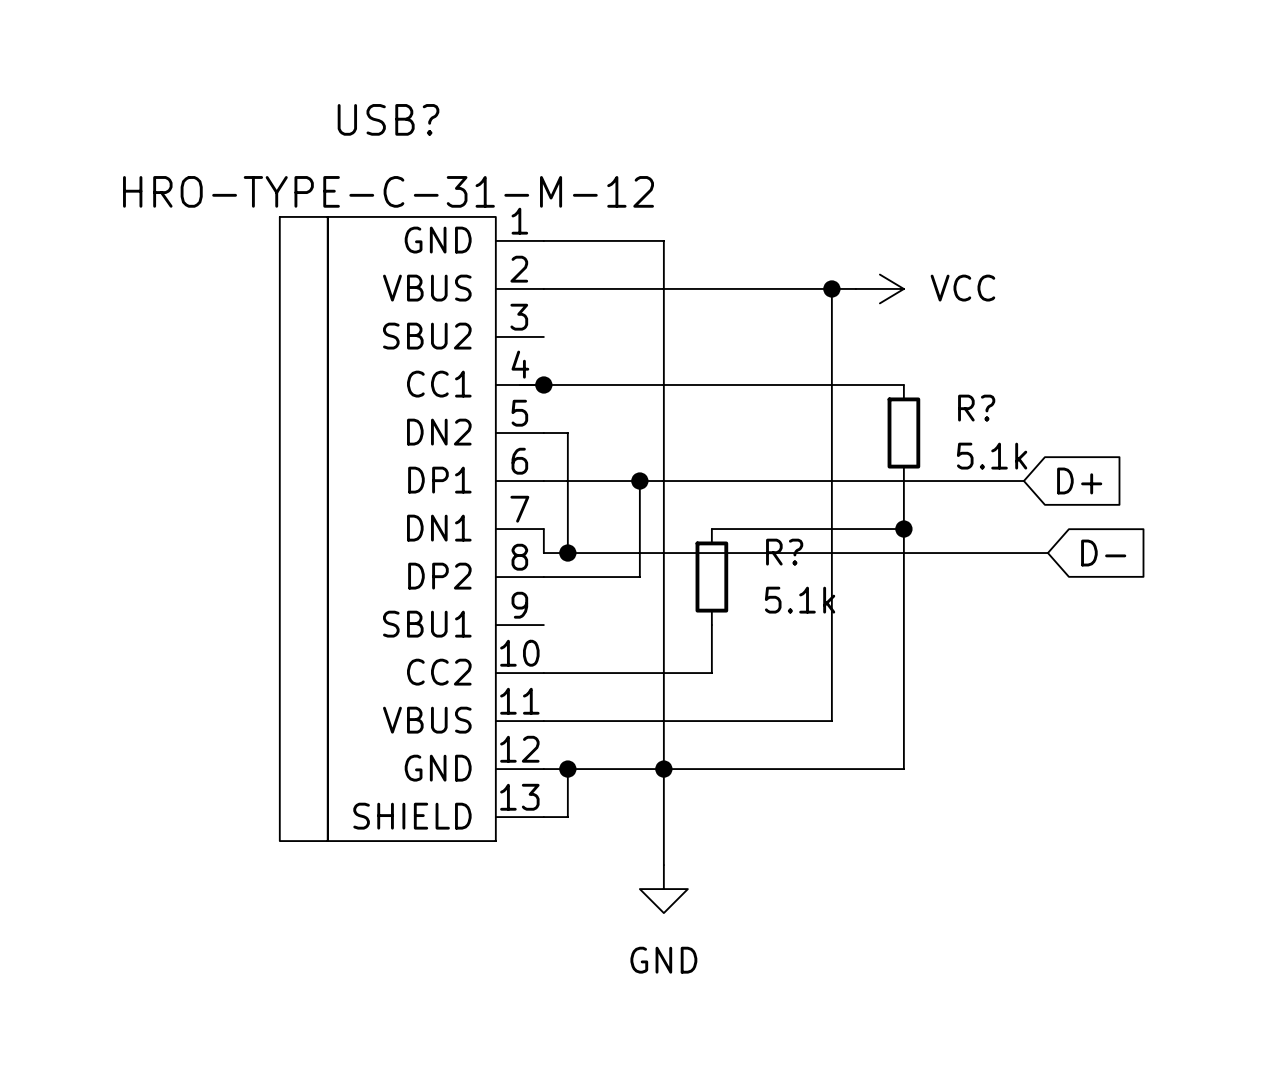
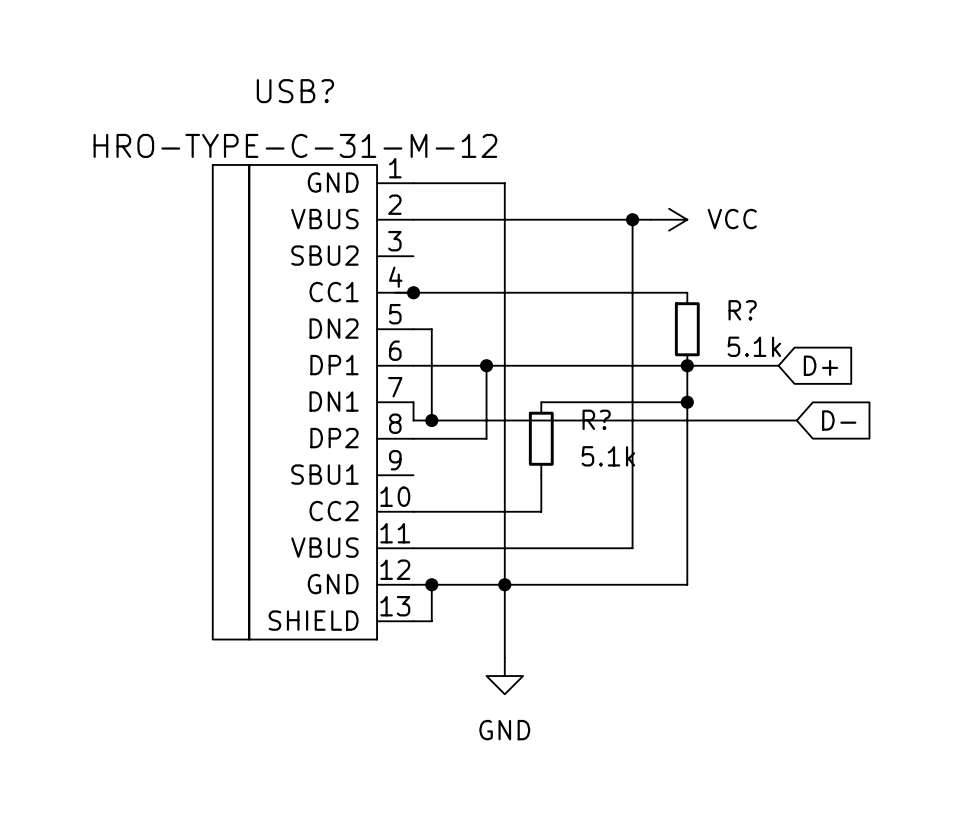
junction: none -> (687, 365)

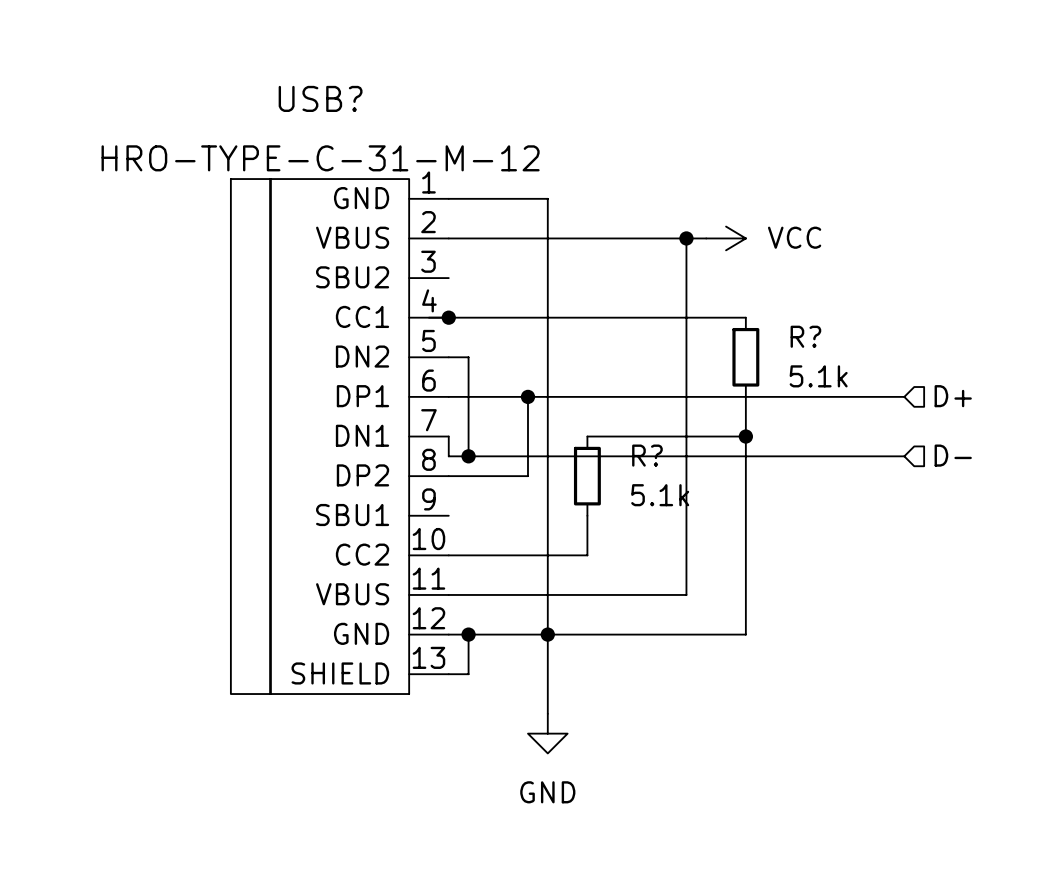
junction: (687, 365) -> none
wire: none -> (844, 396) (904, 396)
global label: D+ (820, 365) -> none
hierarchical label: none -> D+ (953, 396)
hierarchical label: none -> D- (953, 455)
wire: none -> (864, 456) (904, 456)
global label: D- (839, 420) -> none

